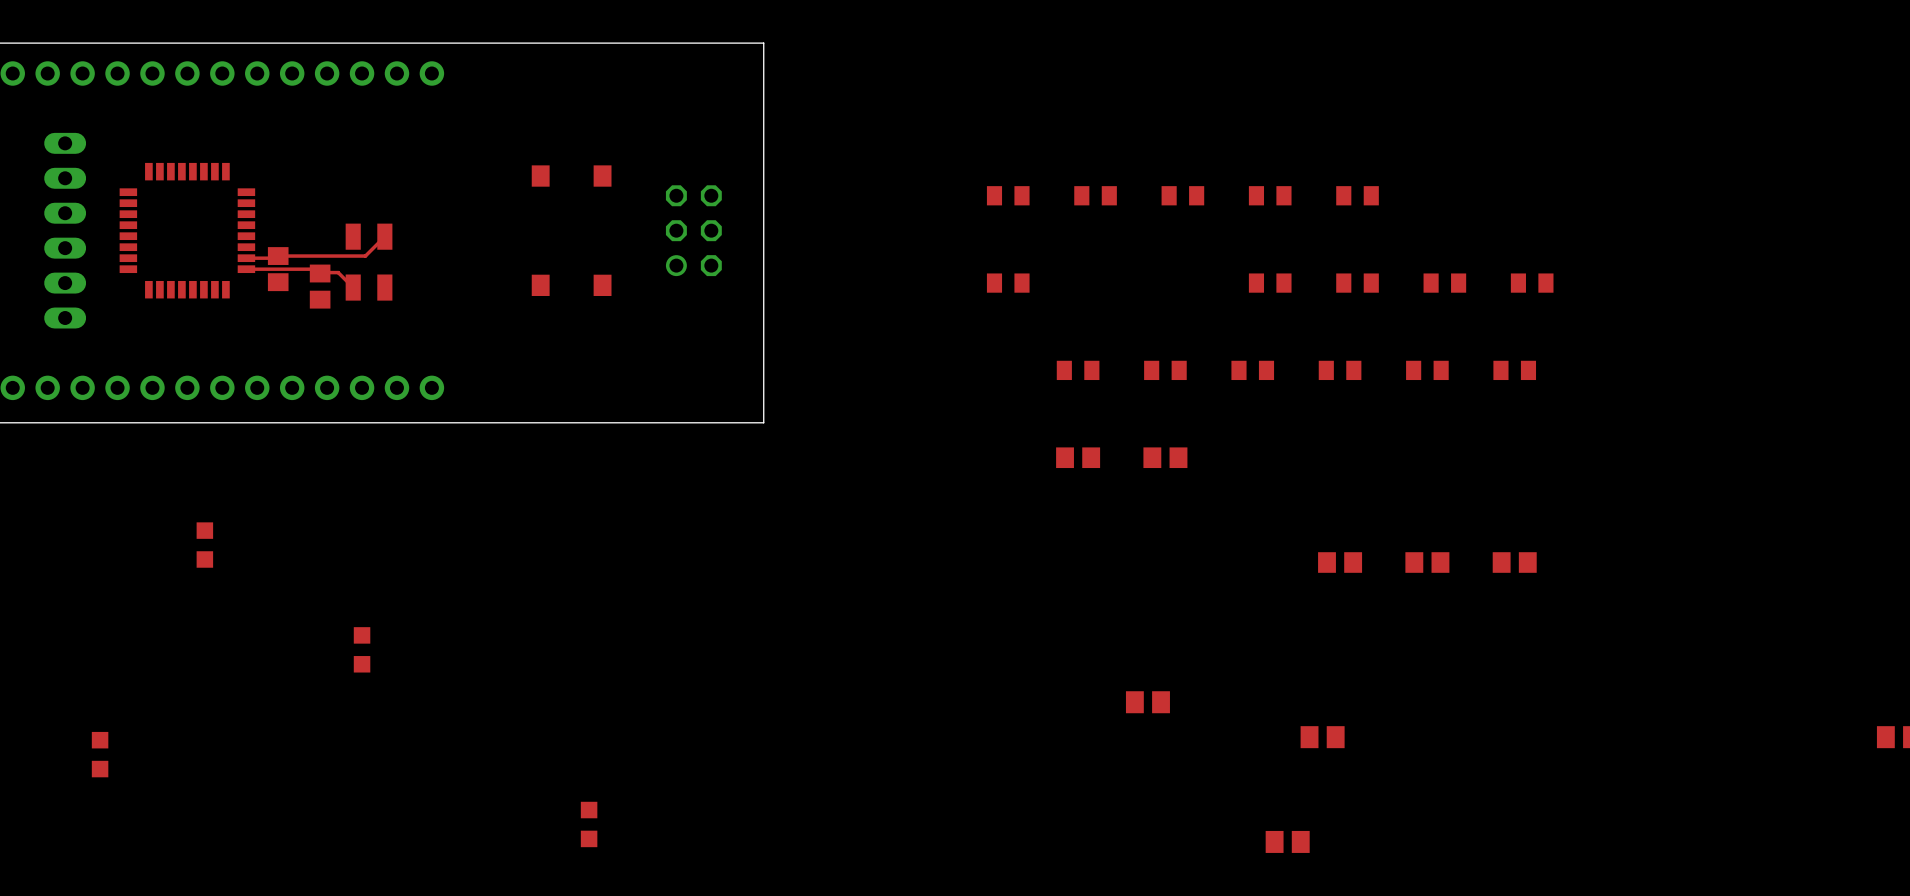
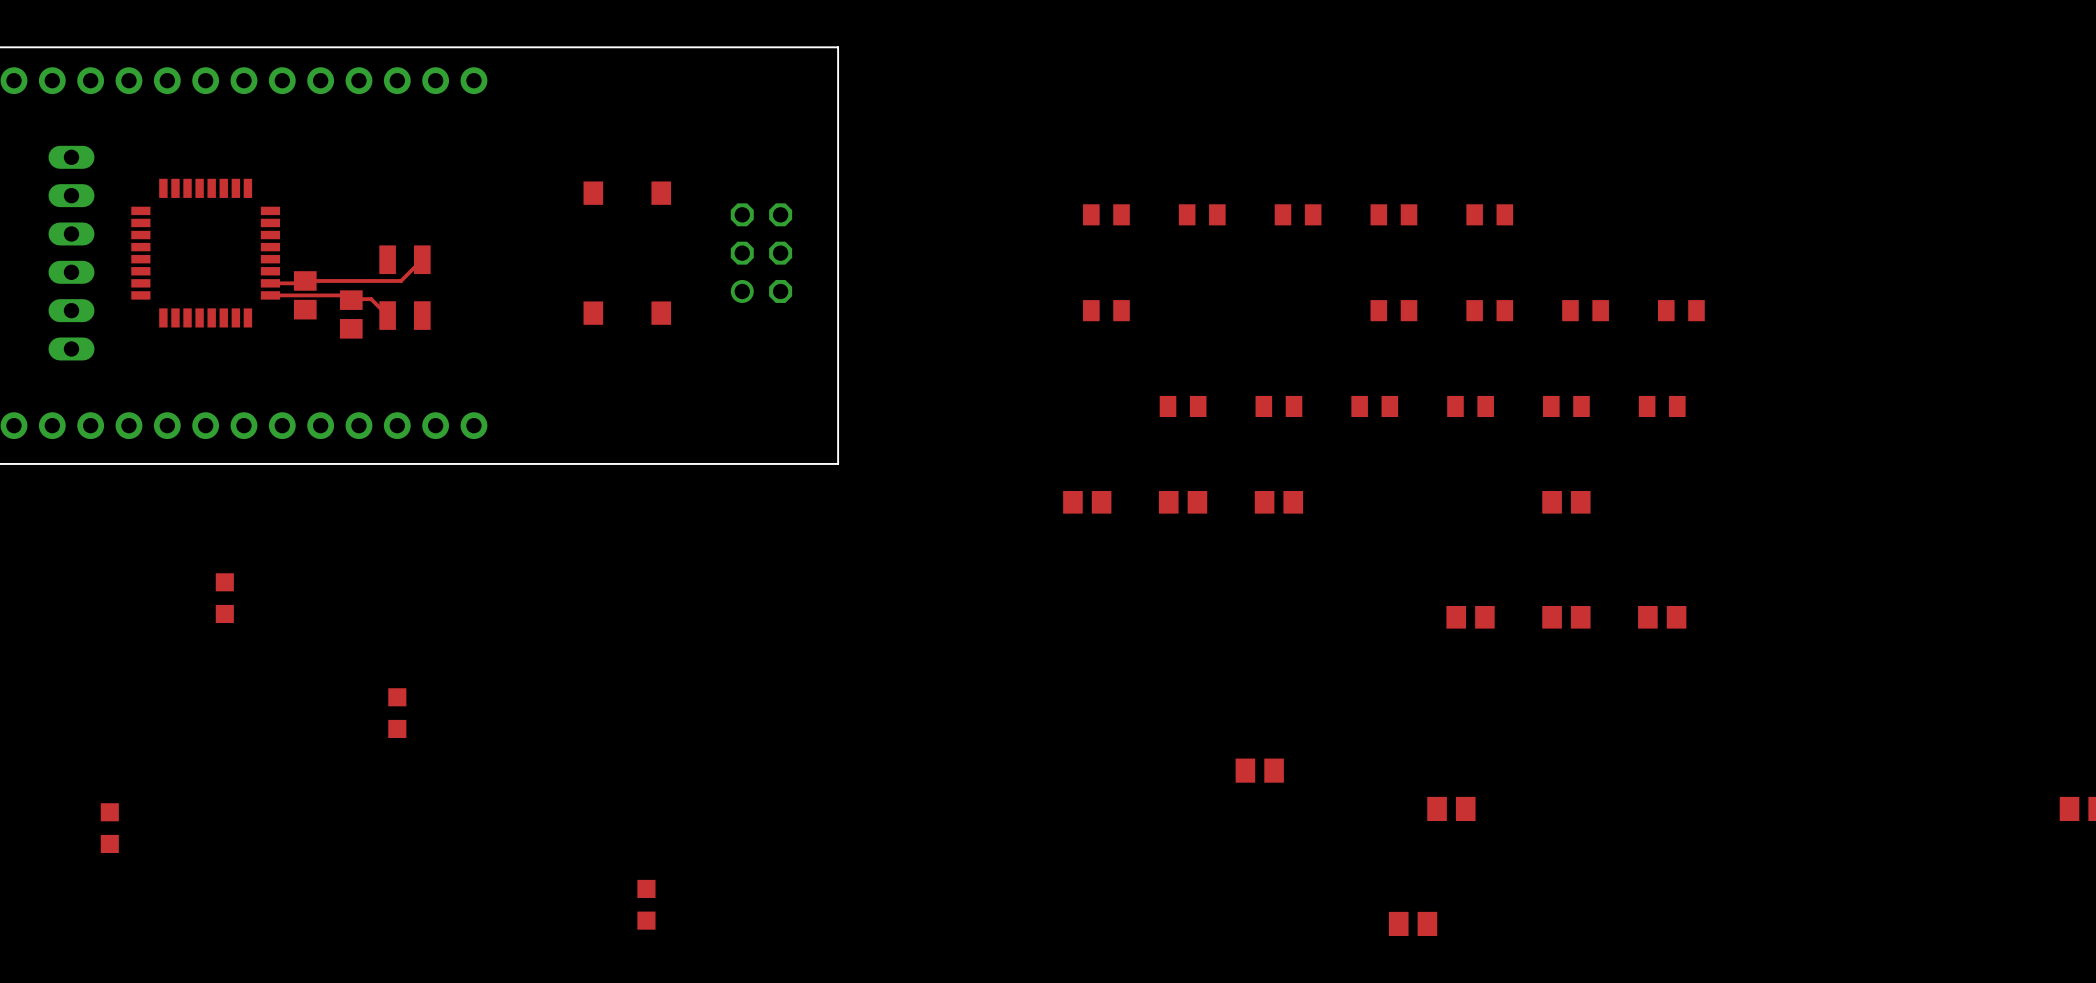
part: none -> (1087, 502)
part: none -> (1566, 502)

